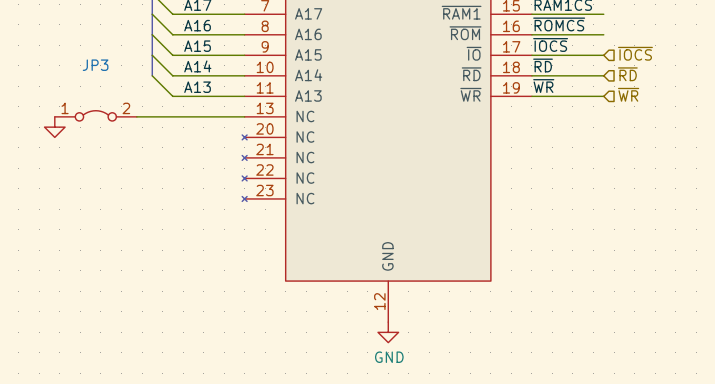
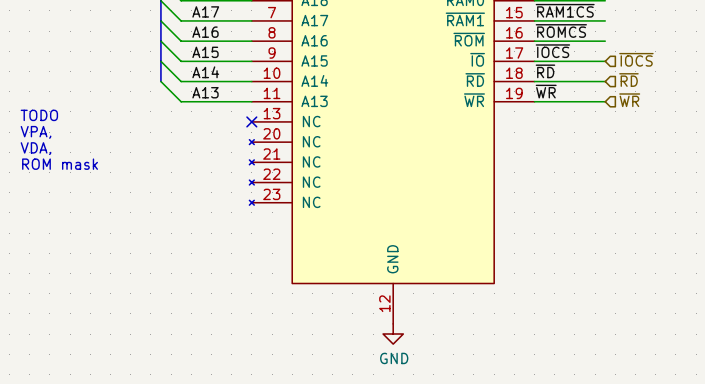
text: none -> TODO (39, 115)
JP3: (95, 115) -> none
wire: (136, 116) (244, 116) -> none
no-connect mark: none -> (251, 121)
text: none -> VPA, (36, 132)
power symbol: (54, 127) -> none
text: none -> VDA, (36, 148)
text: none -> ROM mask (60, 164)

